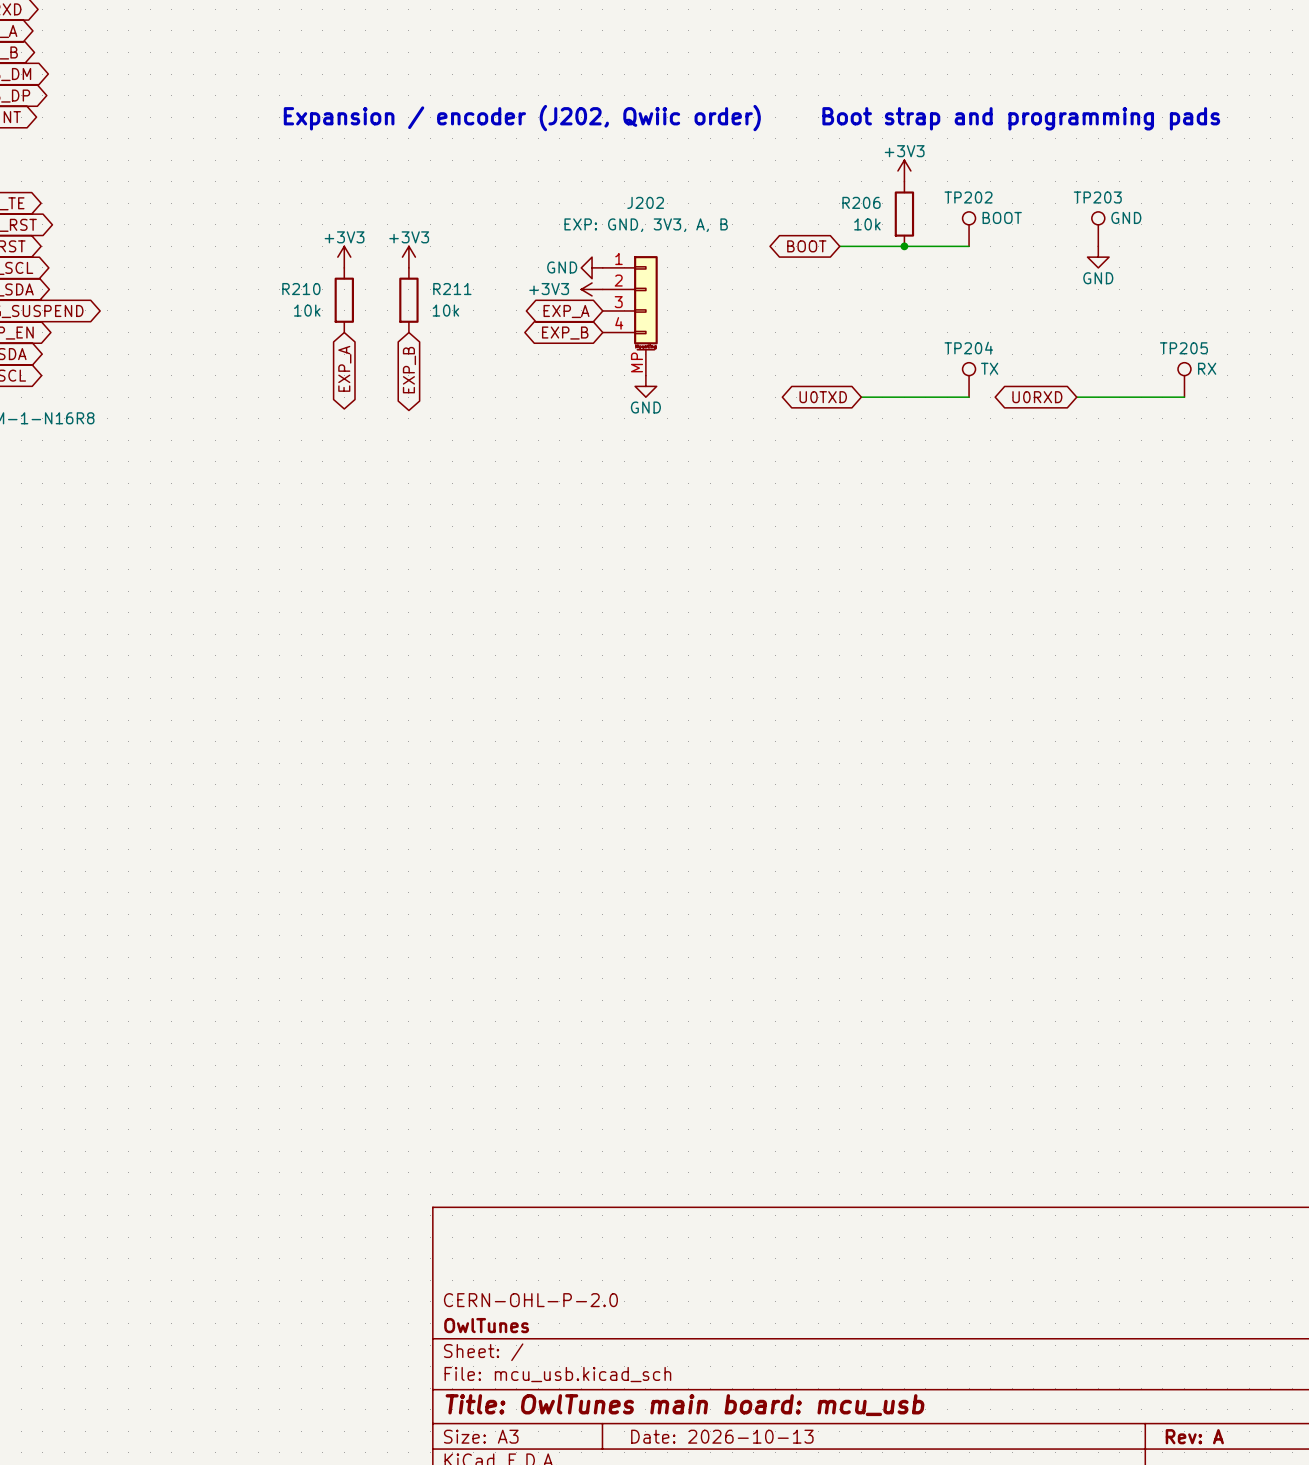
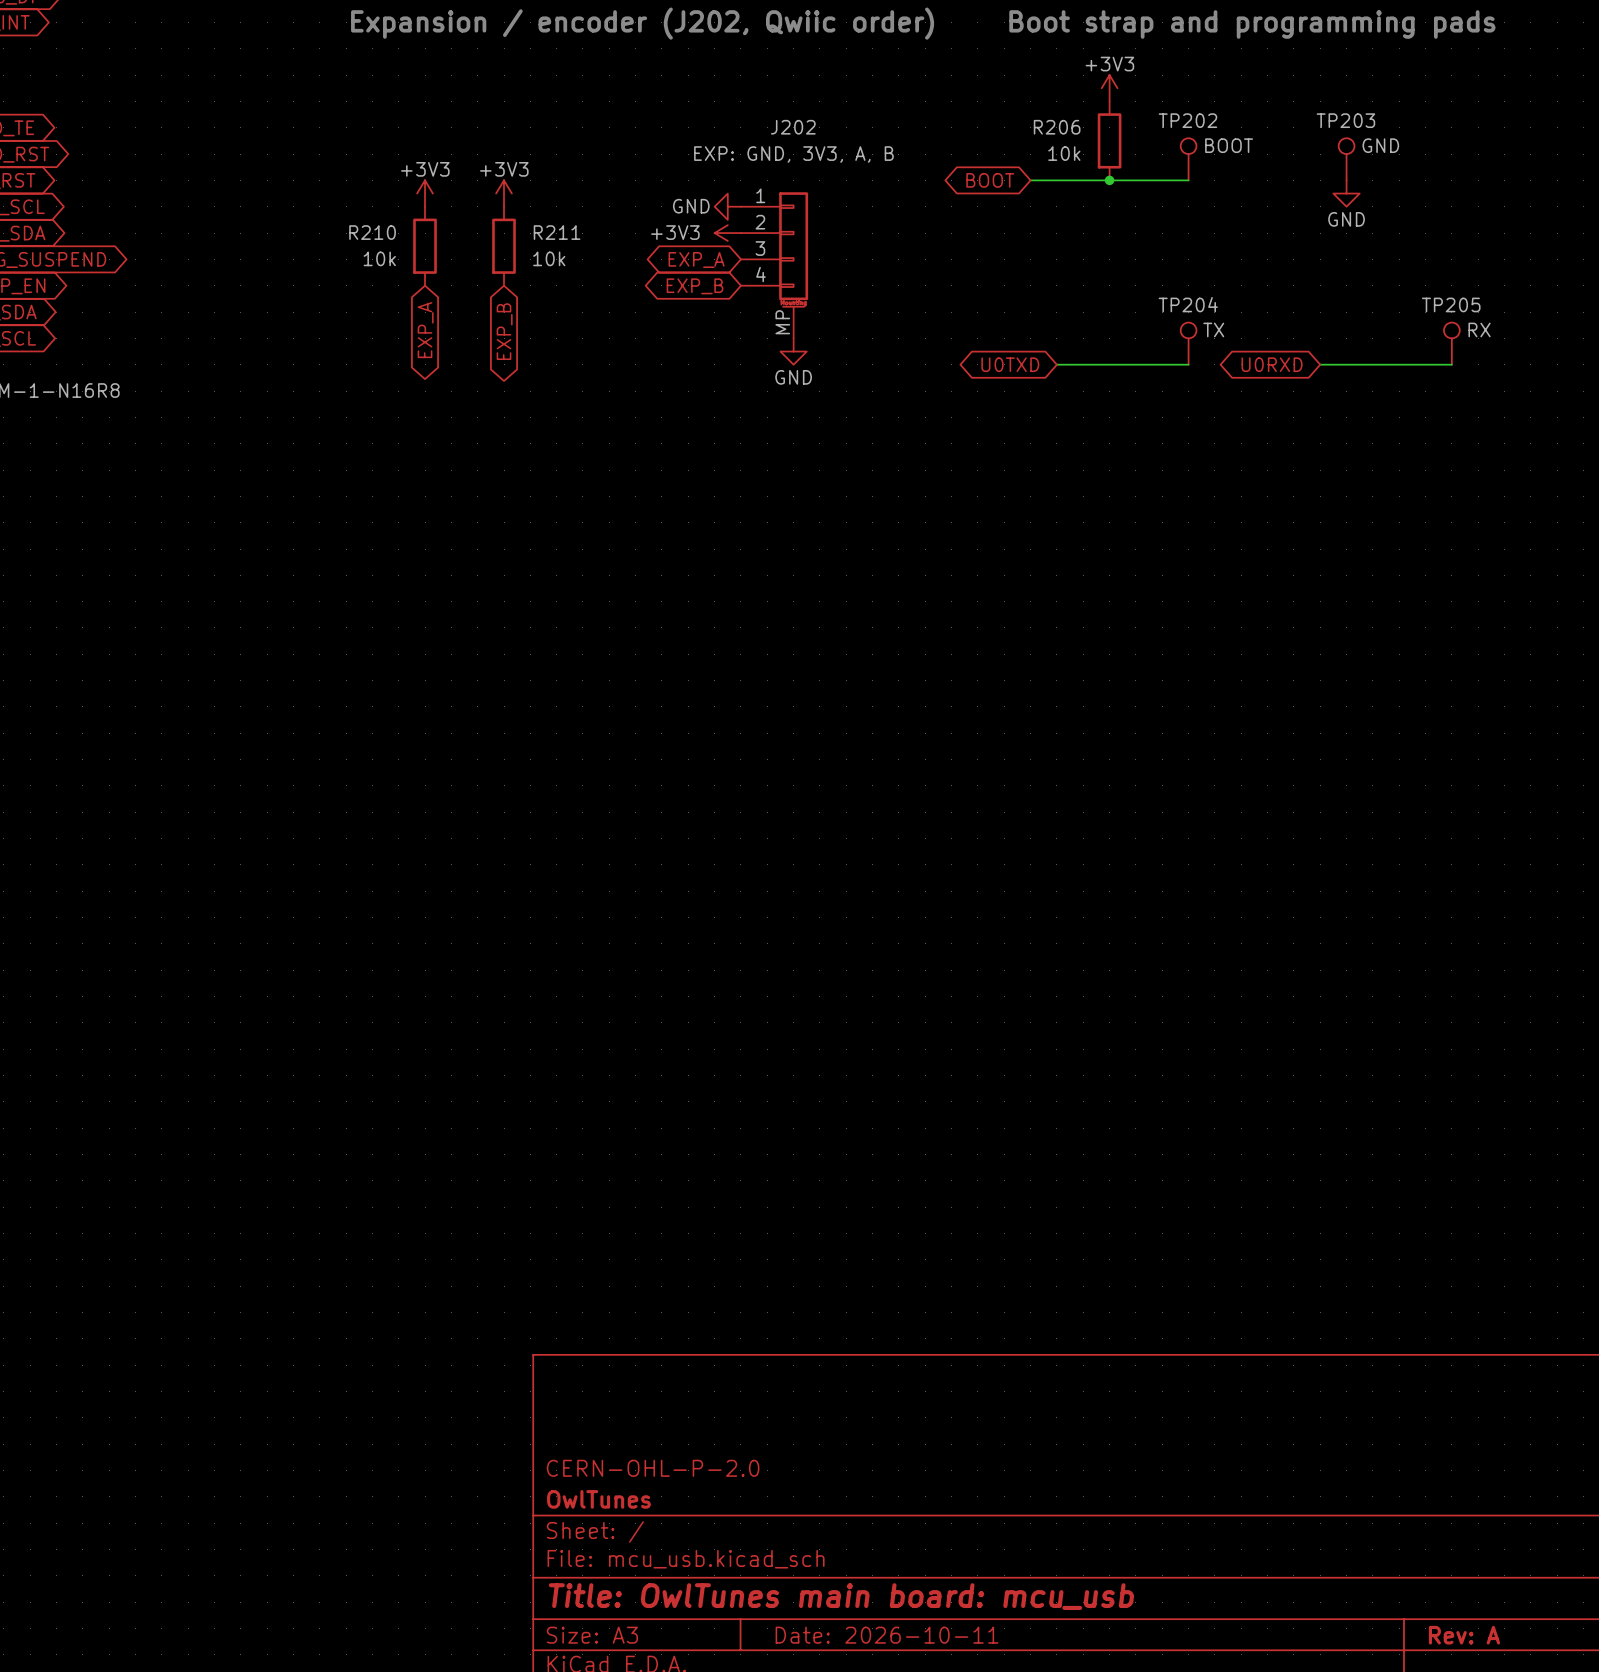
title block: Date: 2026-10-13 (722, 1436) -> Date: 2026-10-11 (887, 1635)

